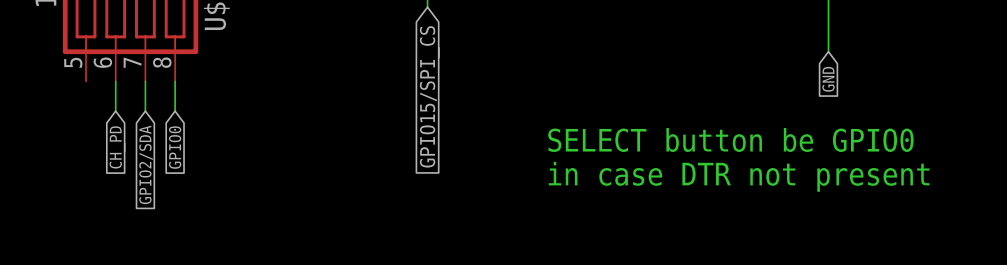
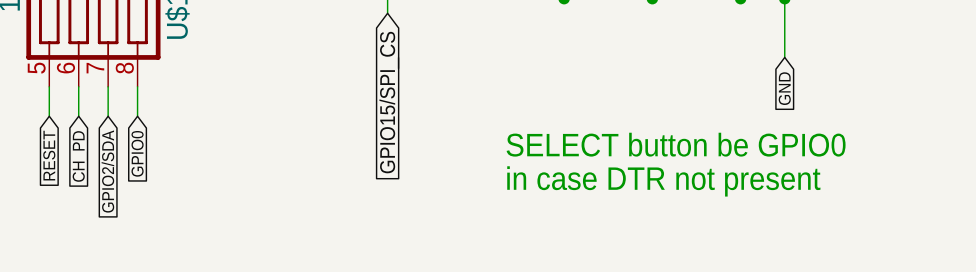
wire: none -> (49, 86) (49, 116)
global label: none -> RESET (49, 155)

